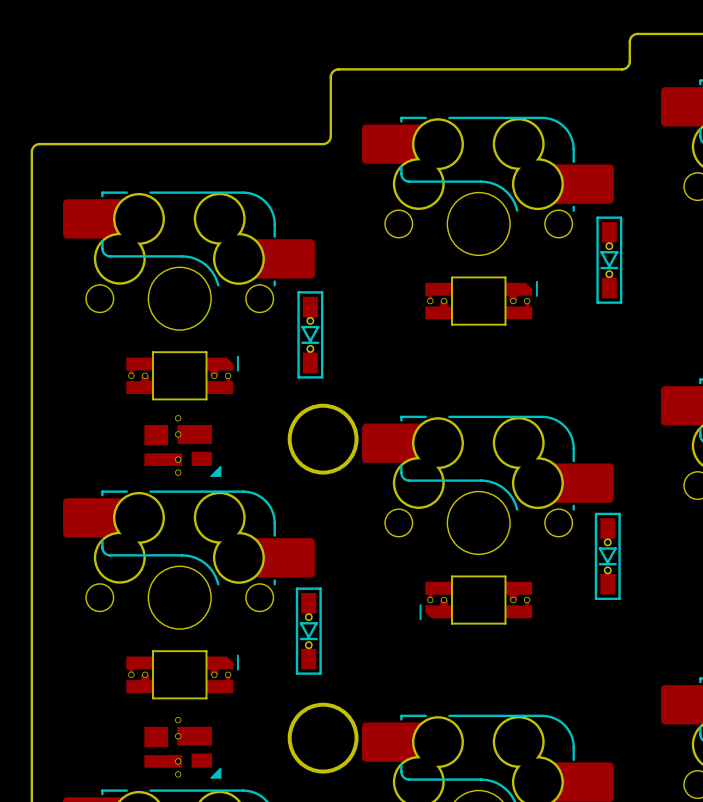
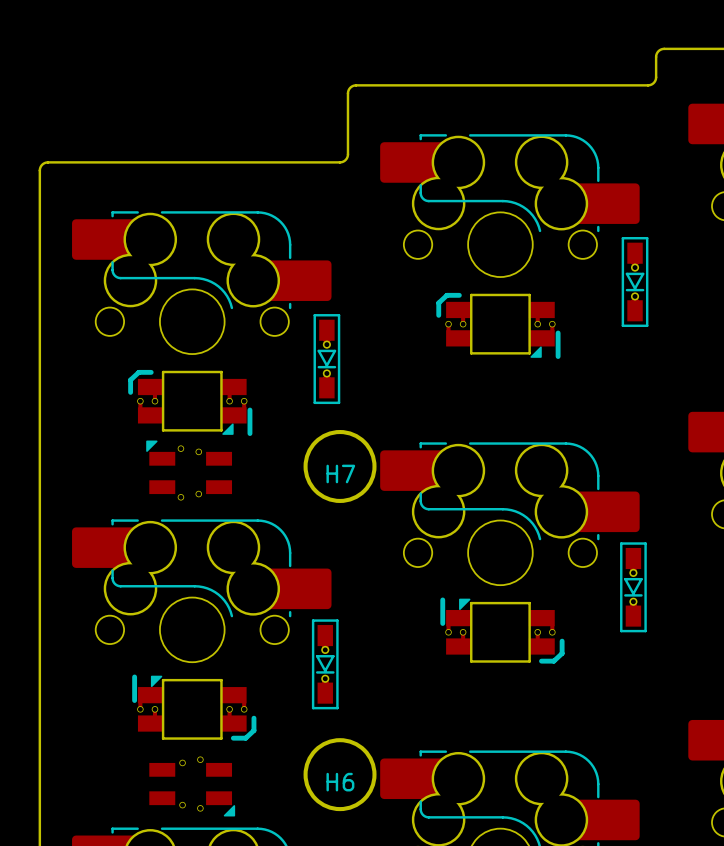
part footprint: [425, 276, 538, 326] -> [436, 292, 561, 359]
part footprint: [126, 351, 239, 401] -> [128, 369, 253, 436]
part footprint: [144, 415, 222, 477] -> [146, 440, 233, 501]
H7 name: none -> H7 (340, 473)
part footprint: [419, 575, 533, 625] -> [440, 597, 565, 664]
part footprint: [126, 650, 239, 700] -> [132, 674, 257, 741]
part footprint: [144, 716, 222, 779] -> [149, 756, 236, 817]
H6 name: none -> H6 (340, 782)

